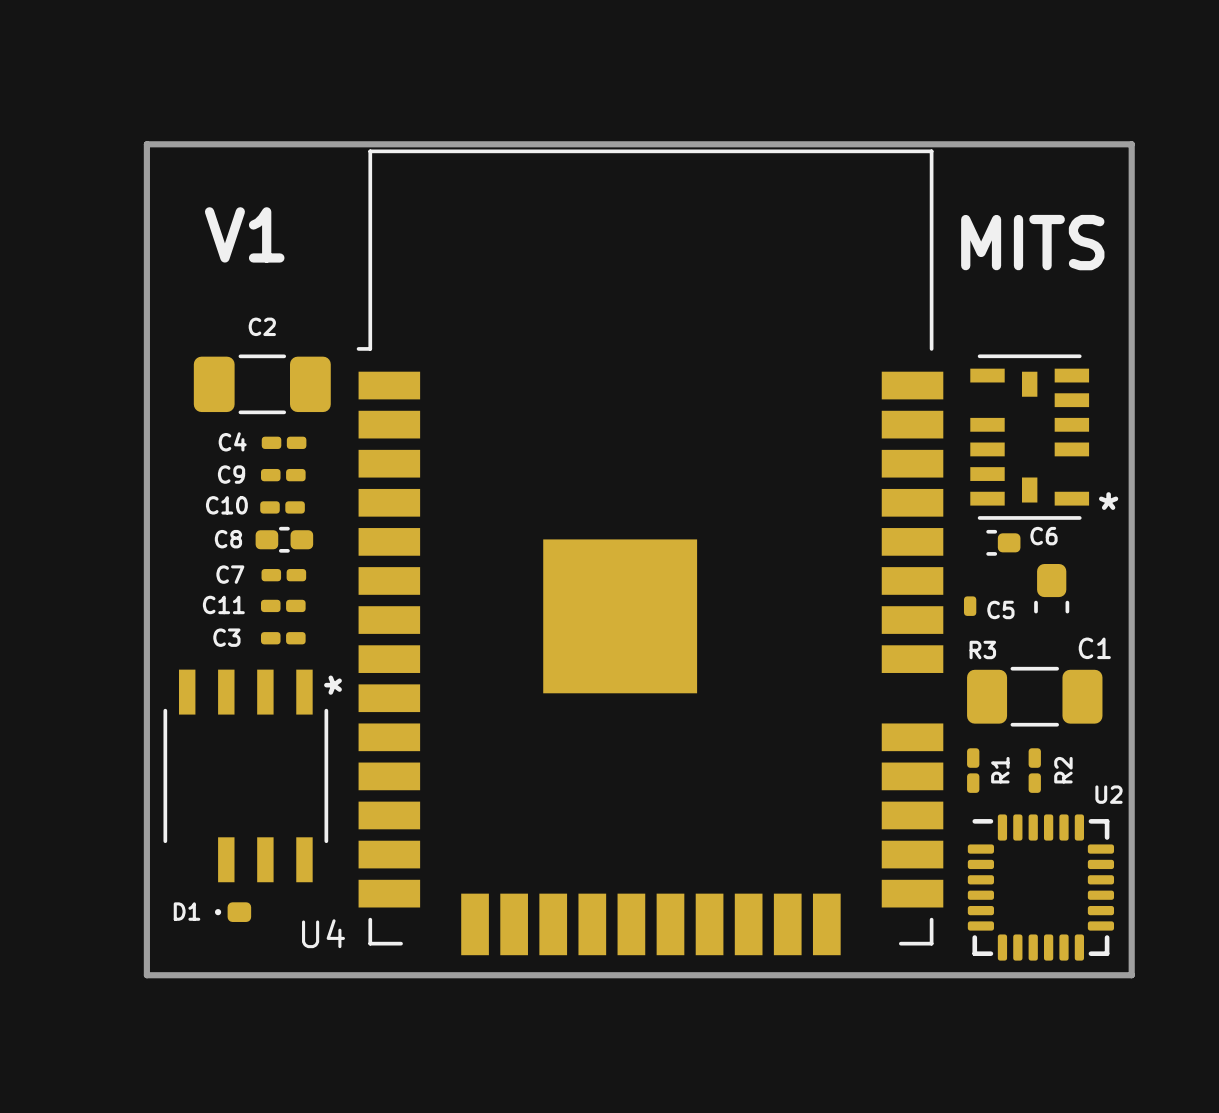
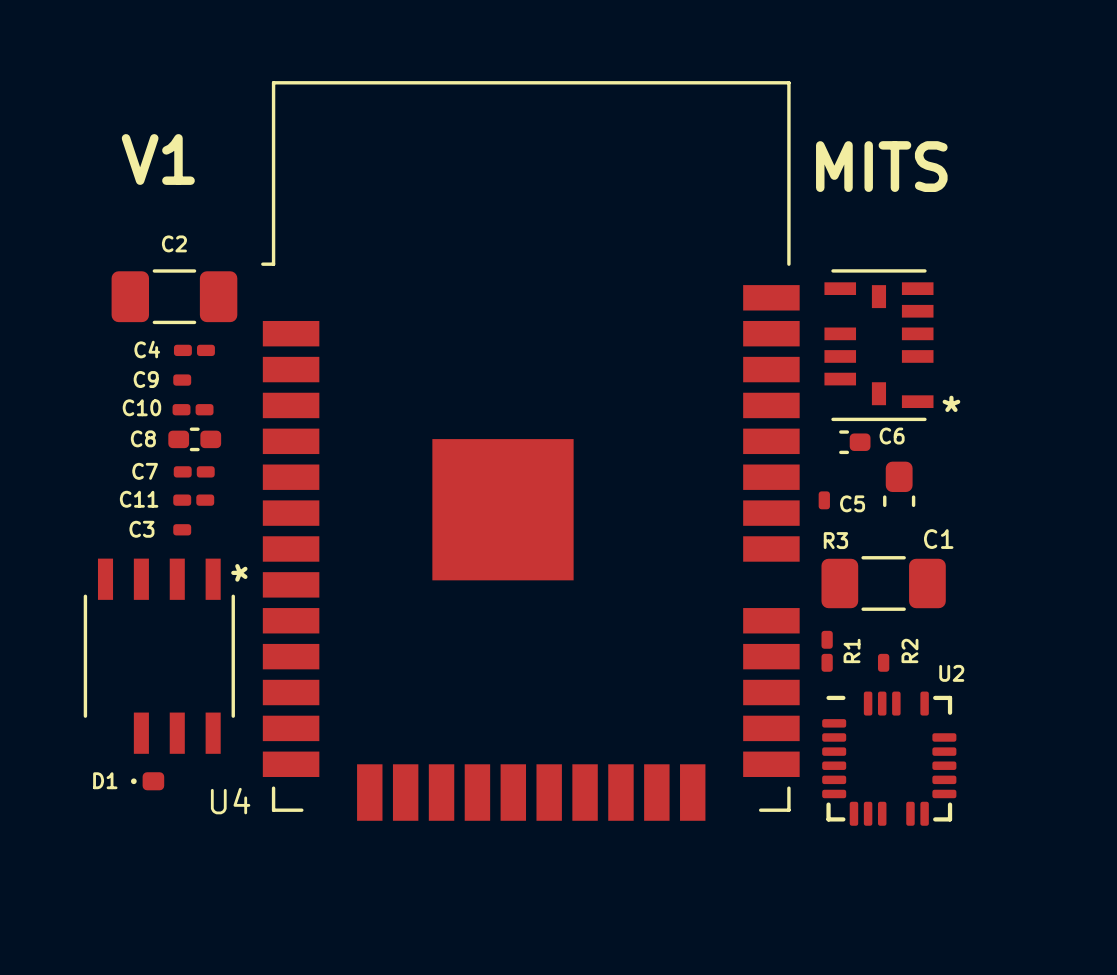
board edge: (146, 144) (1131, 144) (1131, 975) (146, 975) (146, 144) -> none
U4 footprint: [356, 149, 944, 956] -> [261, 81, 800, 821]
part footprint: [970, 354, 1090, 520] -> [824, 269, 934, 422]
C9 footprint: [260, 468, 306, 482] -> [173, 374, 192, 386]
C3 footprint: [260, 632, 306, 645] -> [173, 524, 192, 536]
R2 footprint: [1028, 748, 1041, 793] -> [877, 653, 890, 672]
U2 footprint: [967, 814, 1115, 961] -> [822, 691, 957, 826]

